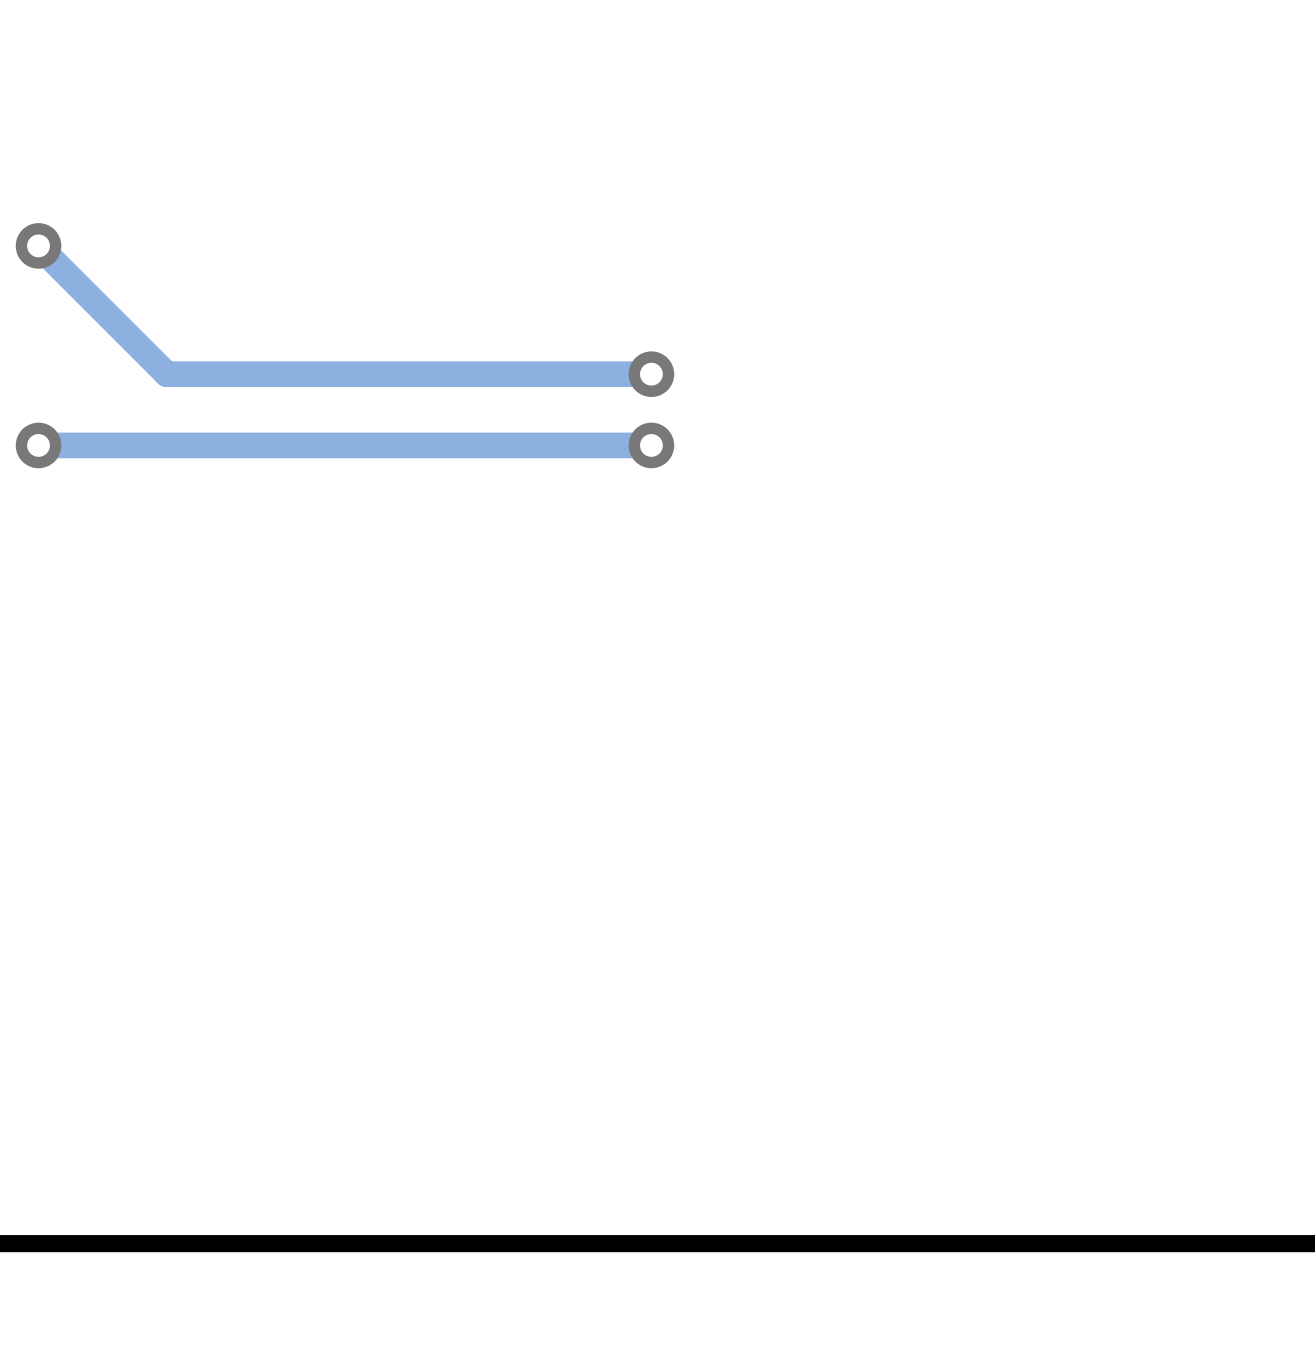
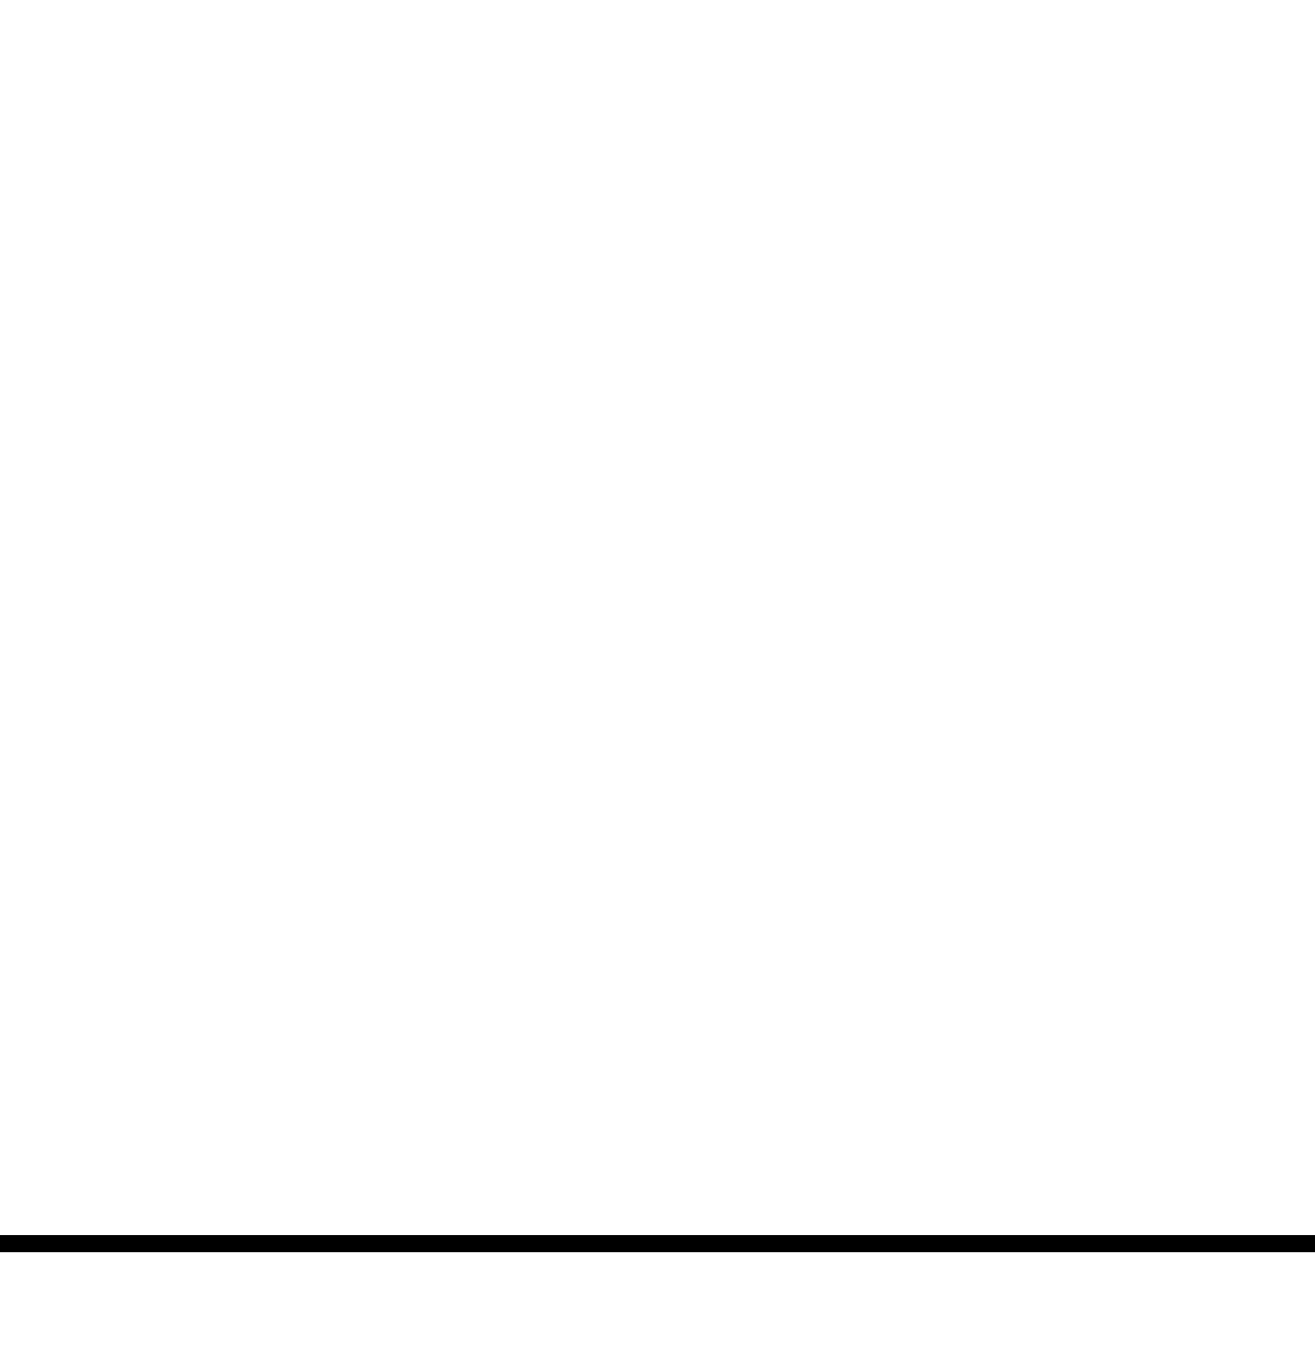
track: (38, 245) (166, 374) (651, 374) -> none
via: (38, 245) -> none
via: (651, 374) -> none
via: (38, 445) -> none
track: (651, 445) (38, 445) -> none
via: (651, 445) -> none

